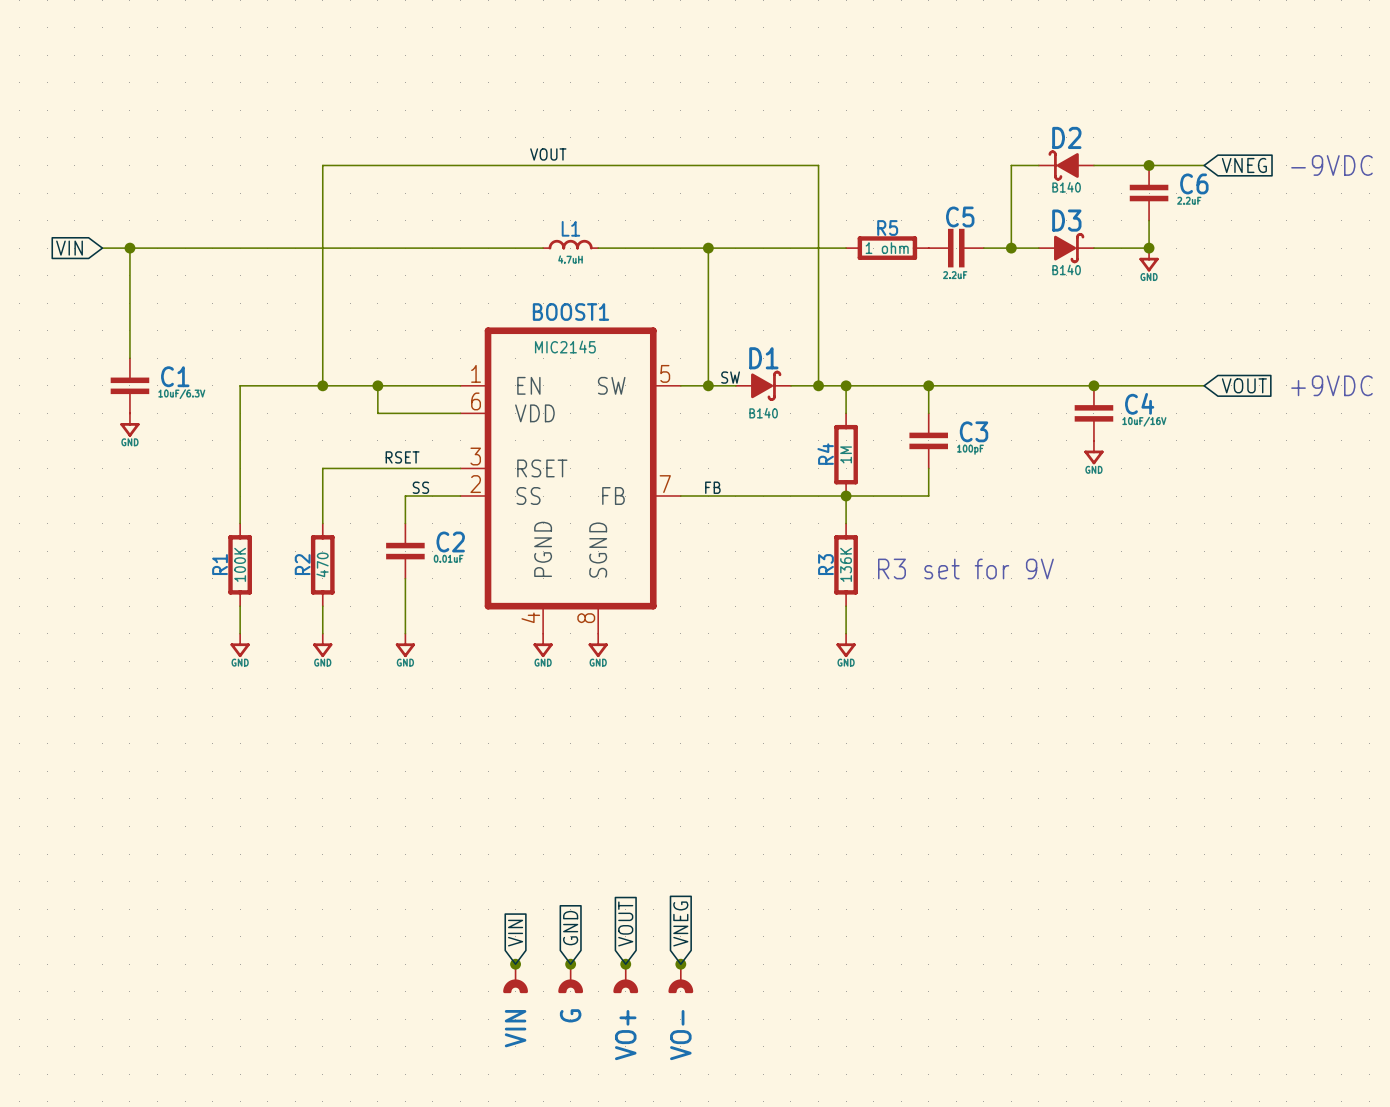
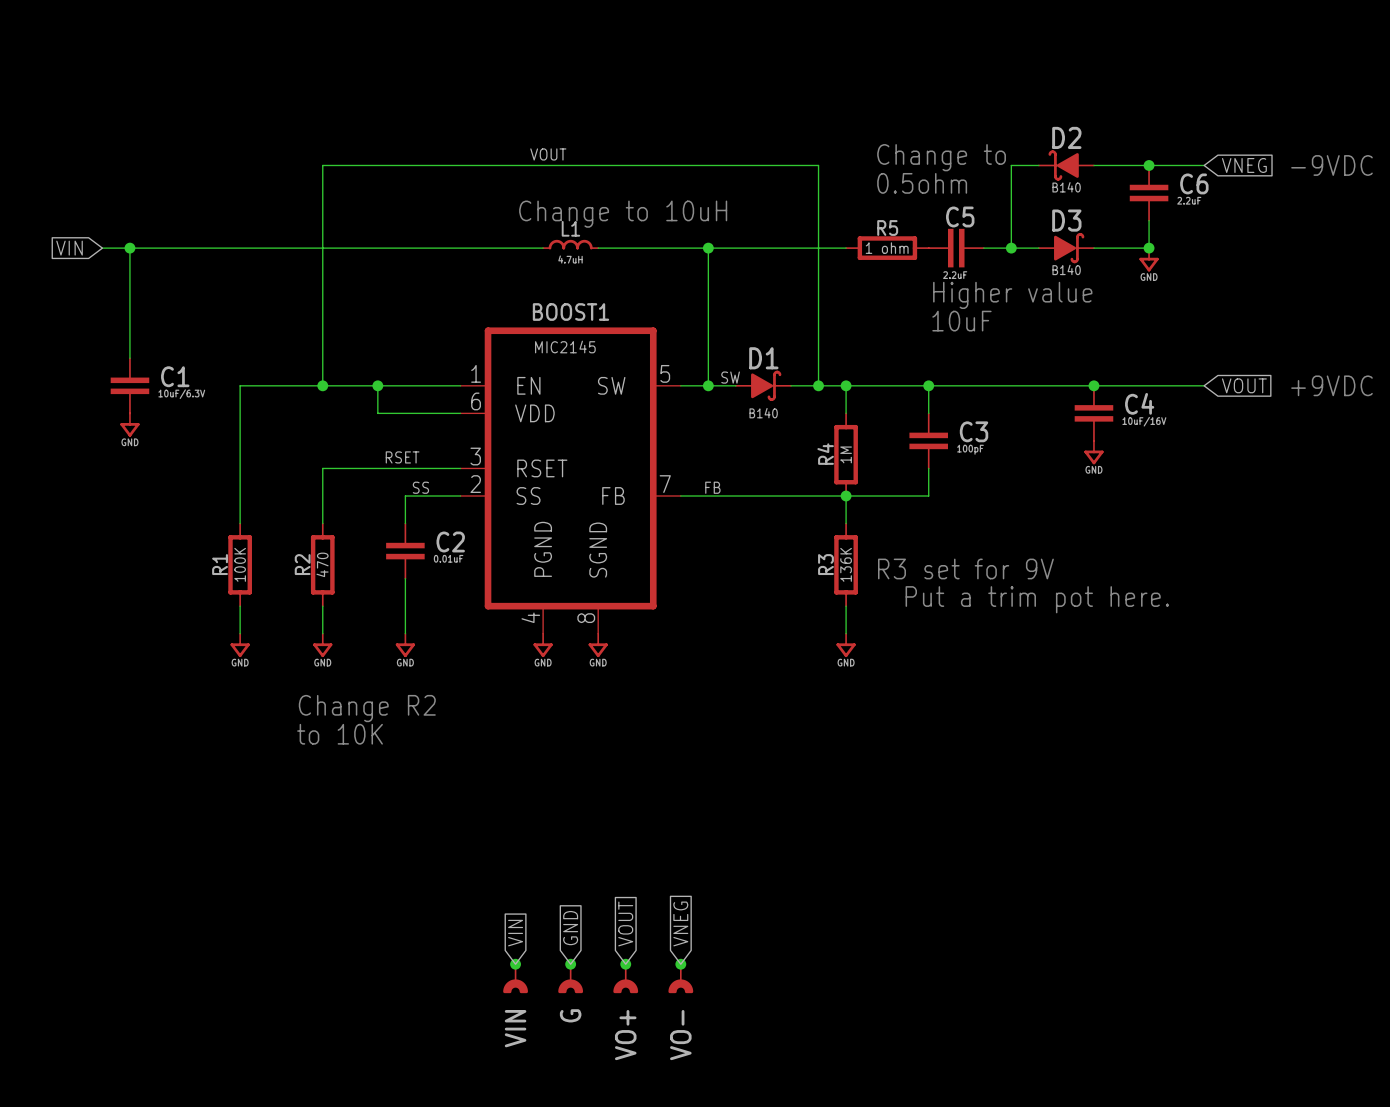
text: none -> Change to (941, 157)
text: none -> 0.5ohm (922, 183)
text: none -> Change to 10uH (623, 214)
text: none -> Higher value (1012, 295)
text: none -> 10uF (961, 321)
text: none -> Put a trim pot here. (1037, 599)
text: none -> Change R2 (367, 708)
text: none -> to 10K (340, 734)

